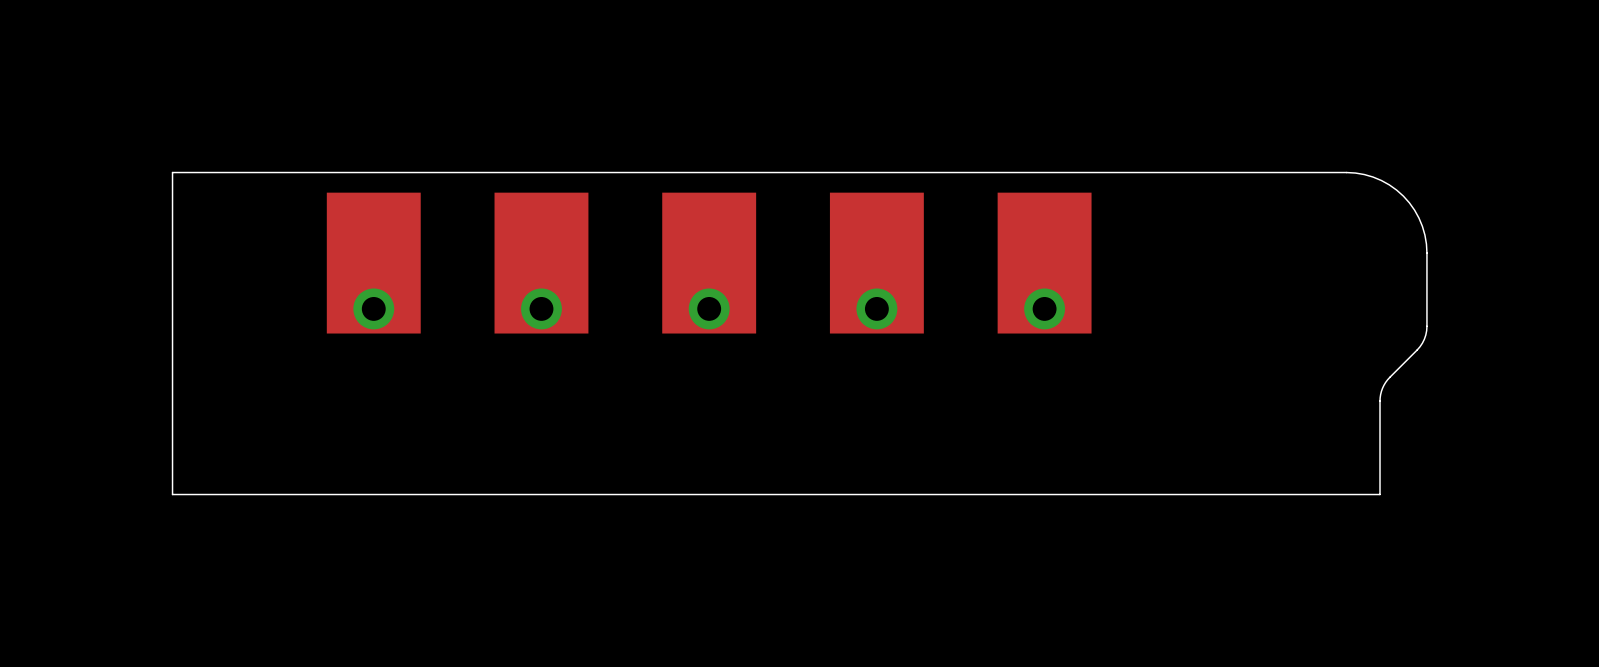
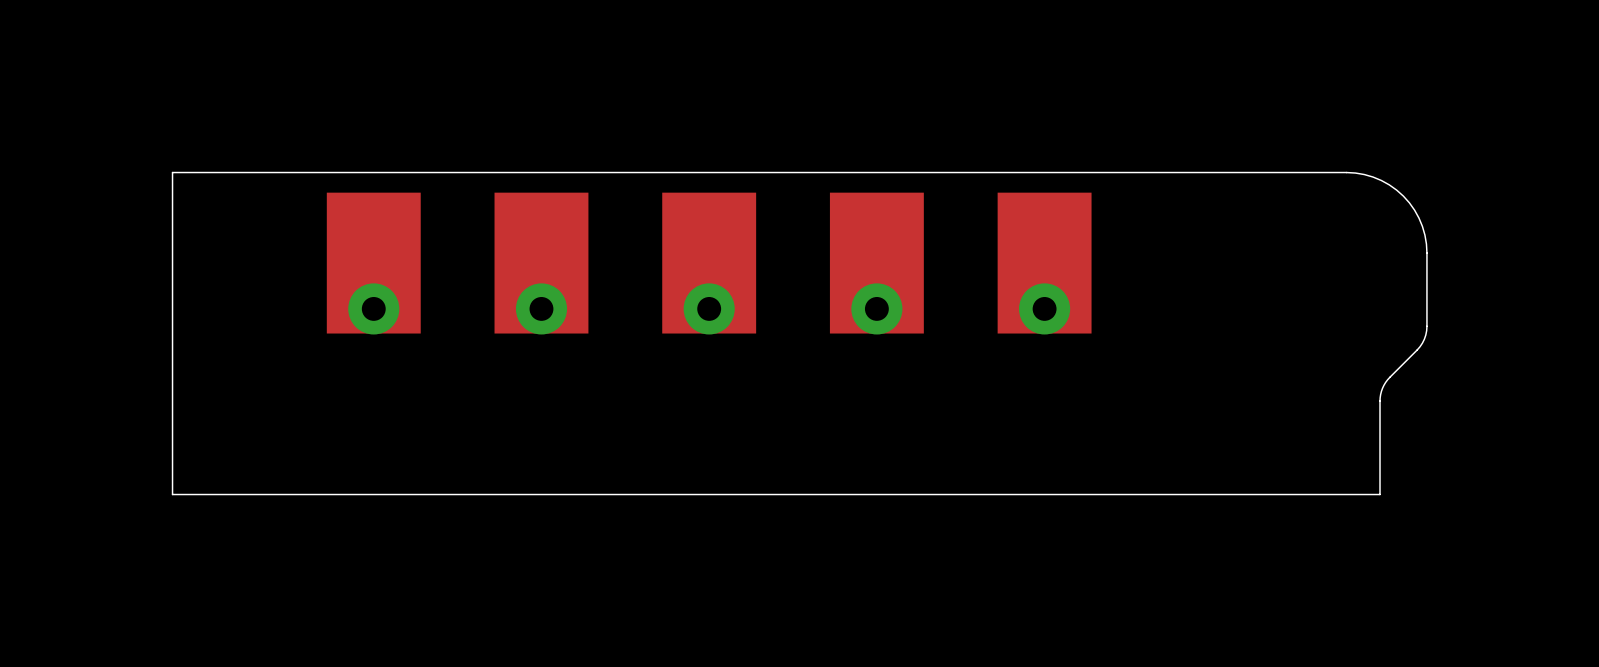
part footprint: [353, 288, 395, 330] -> [348, 283, 400, 335]
part footprint: [521, 288, 562, 330] -> [515, 283, 568, 335]
part footprint: [688, 288, 730, 330] -> [683, 283, 735, 335]
part footprint: [856, 288, 898, 330] -> [851, 283, 903, 335]
part footprint: [1024, 288, 1066, 330] -> [1019, 283, 1071, 335]

